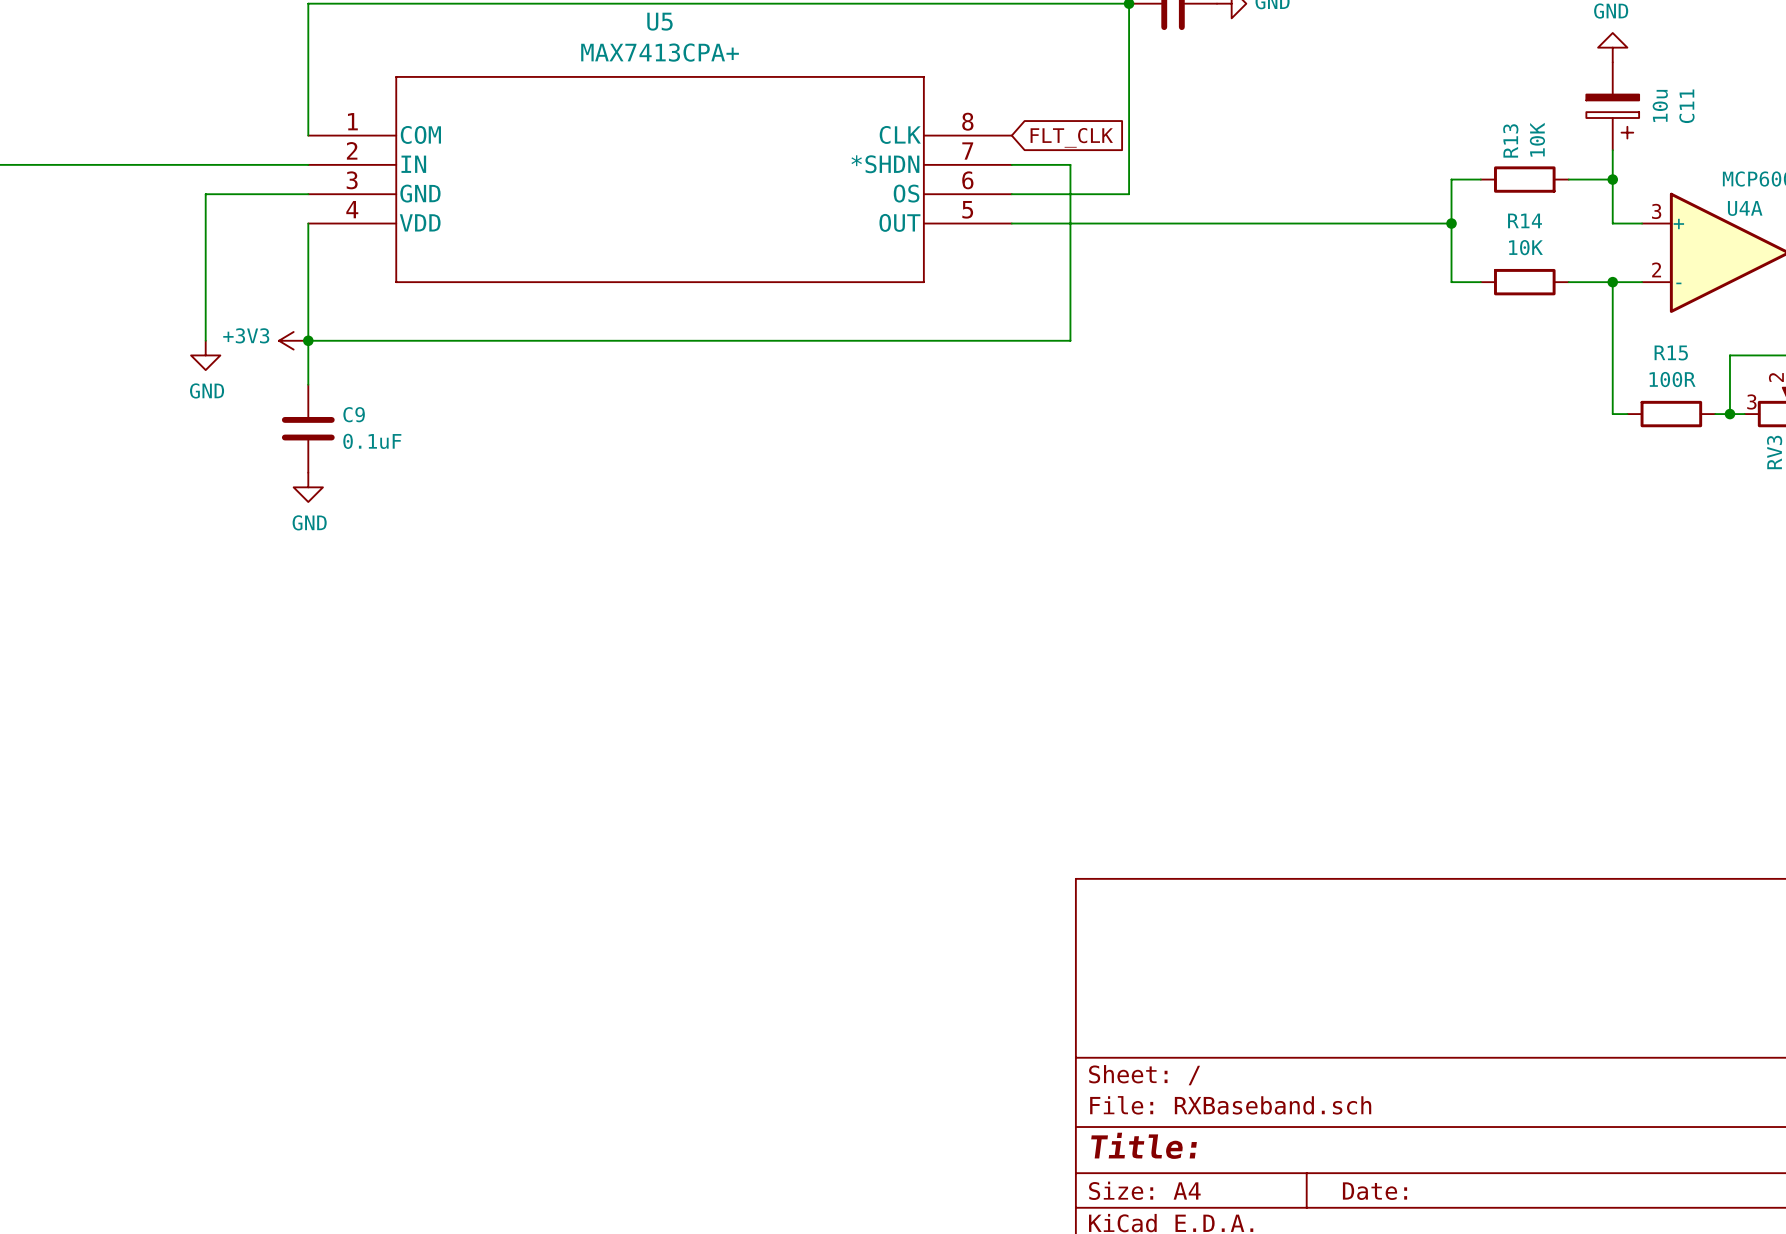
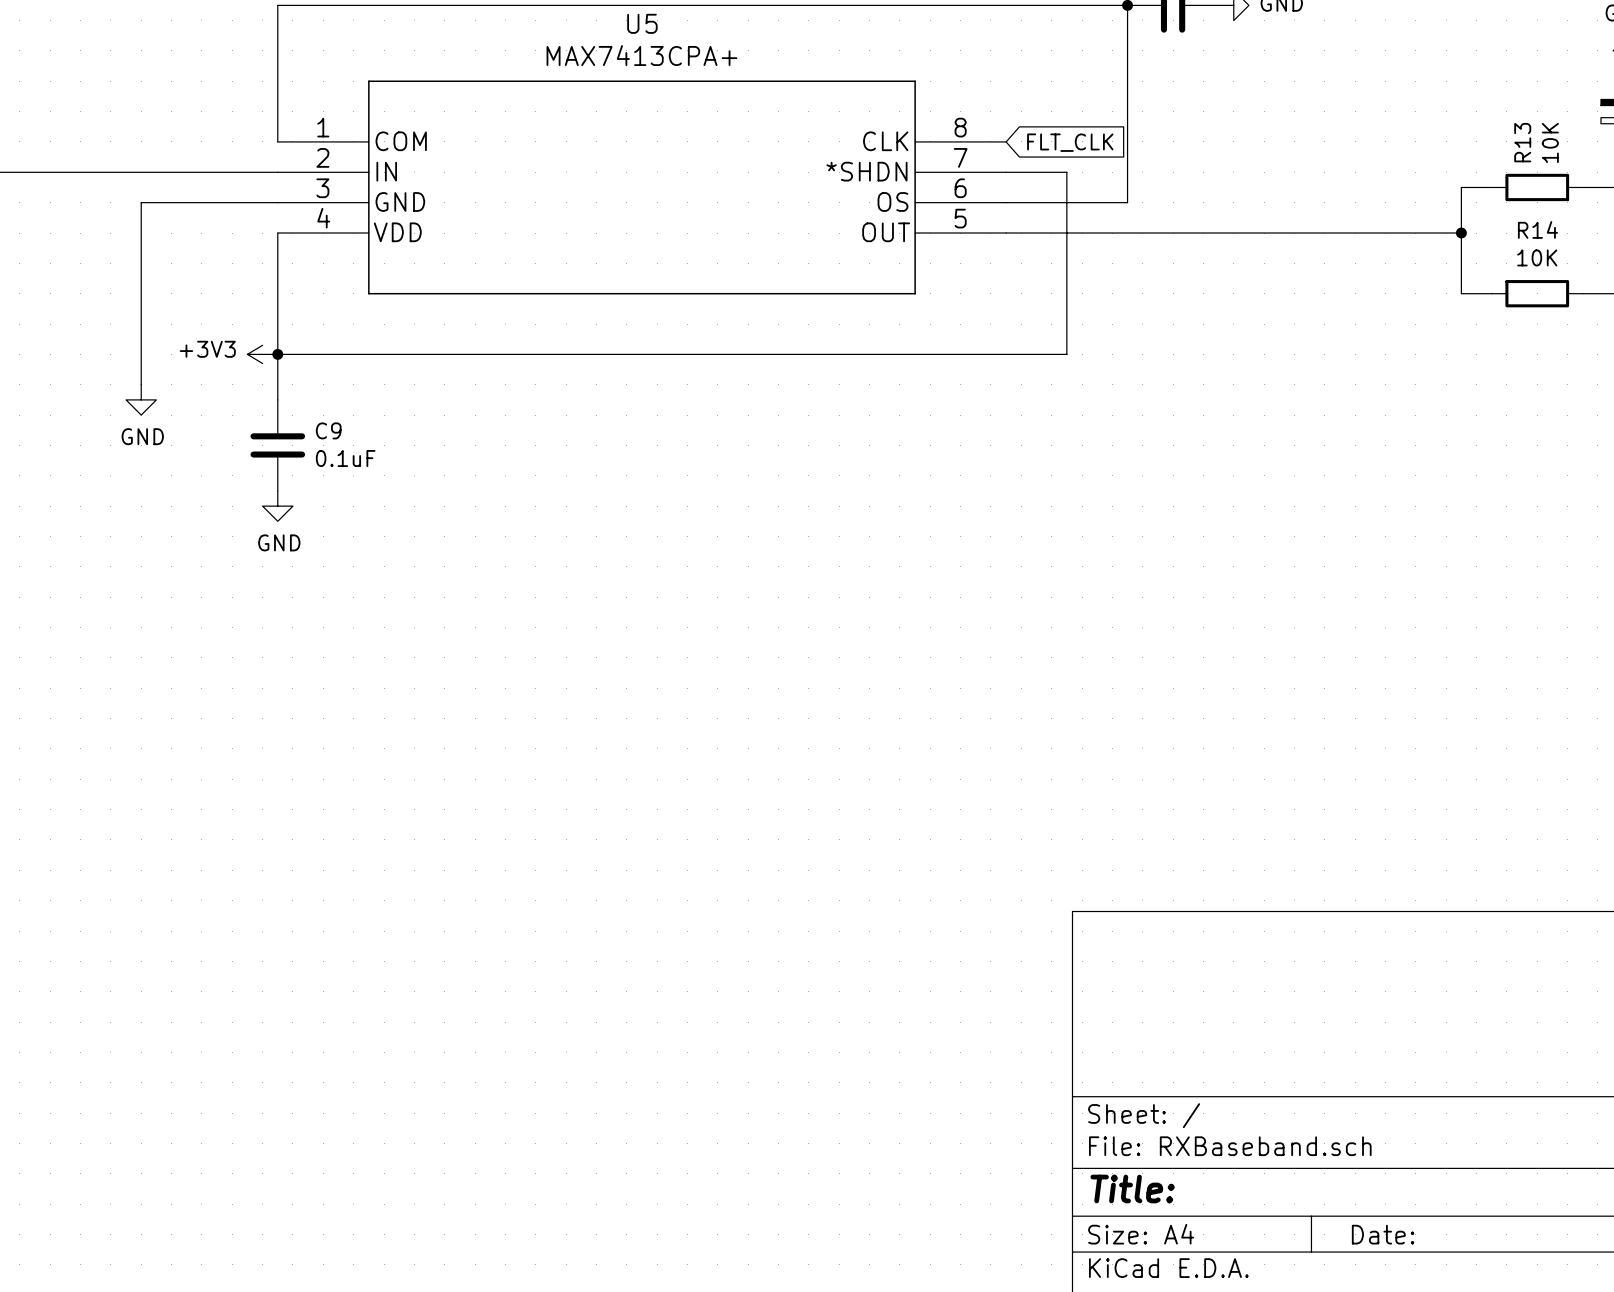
wire: (205, 194) (205, 340) -> (171, 202) (141, 202) (141, 384)
power symbol position: GND (205, 355) -> GND (141, 399)

